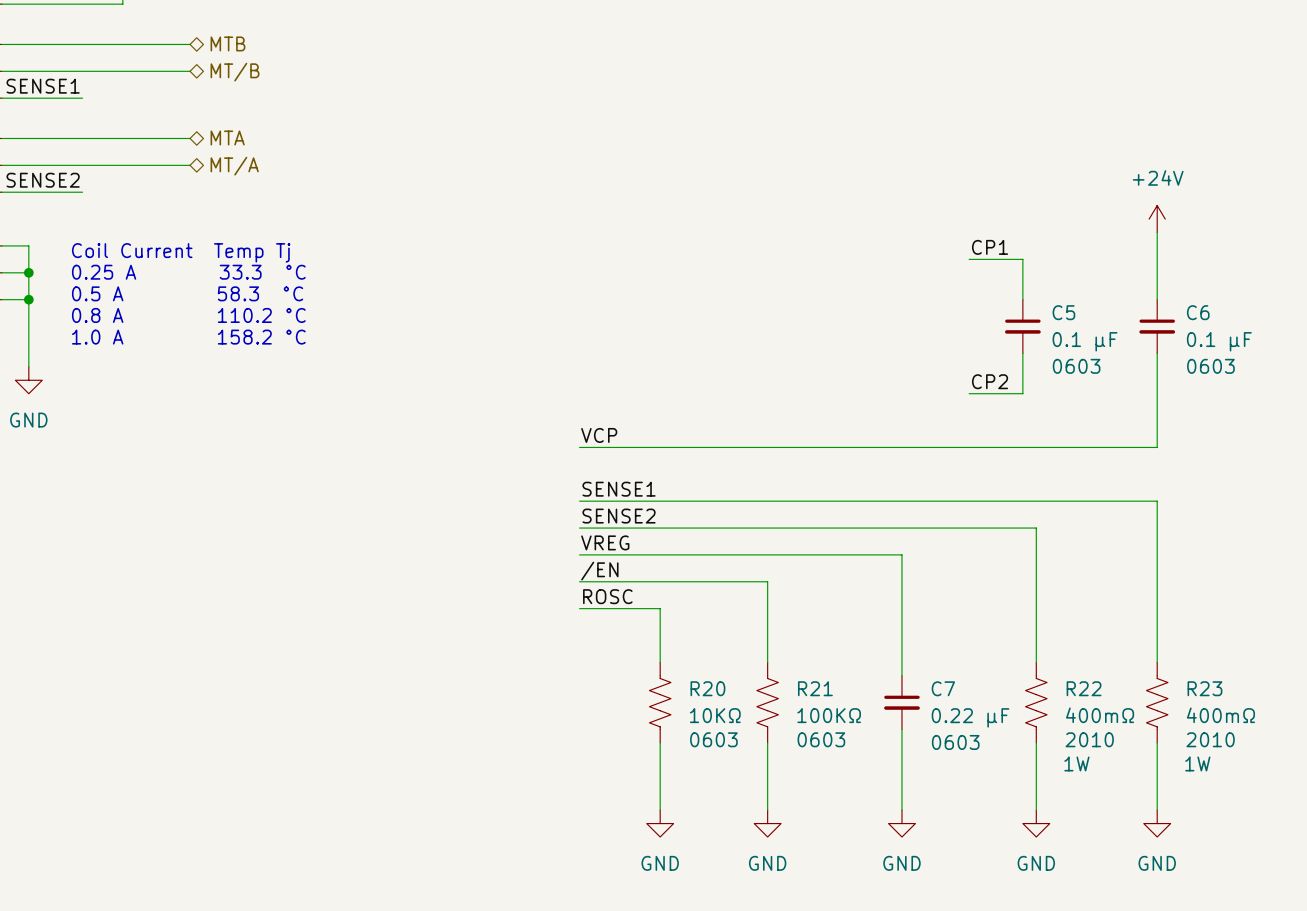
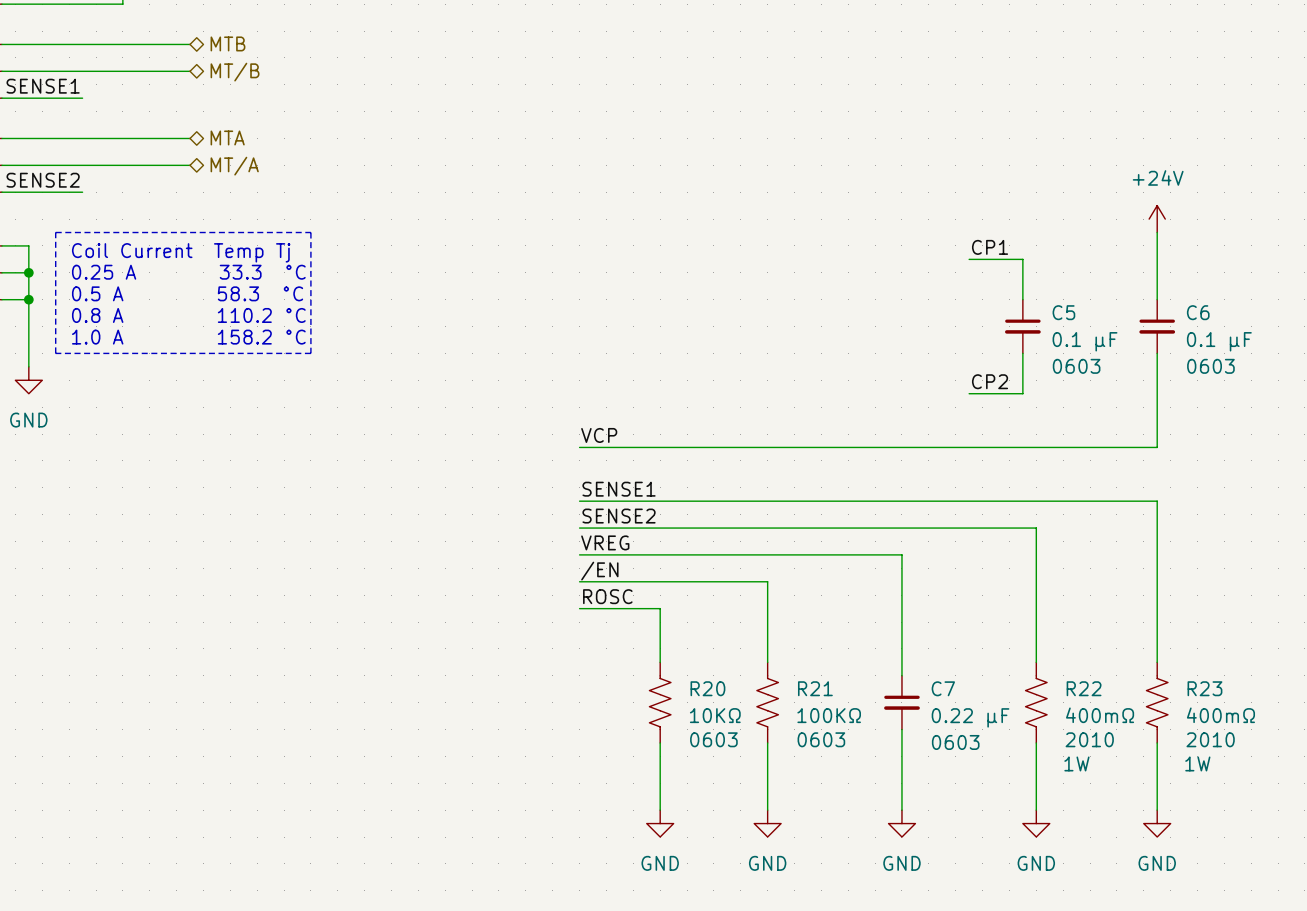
line: none -> (55, 232) (310, 232) (310, 353) (55, 353) (55, 232)

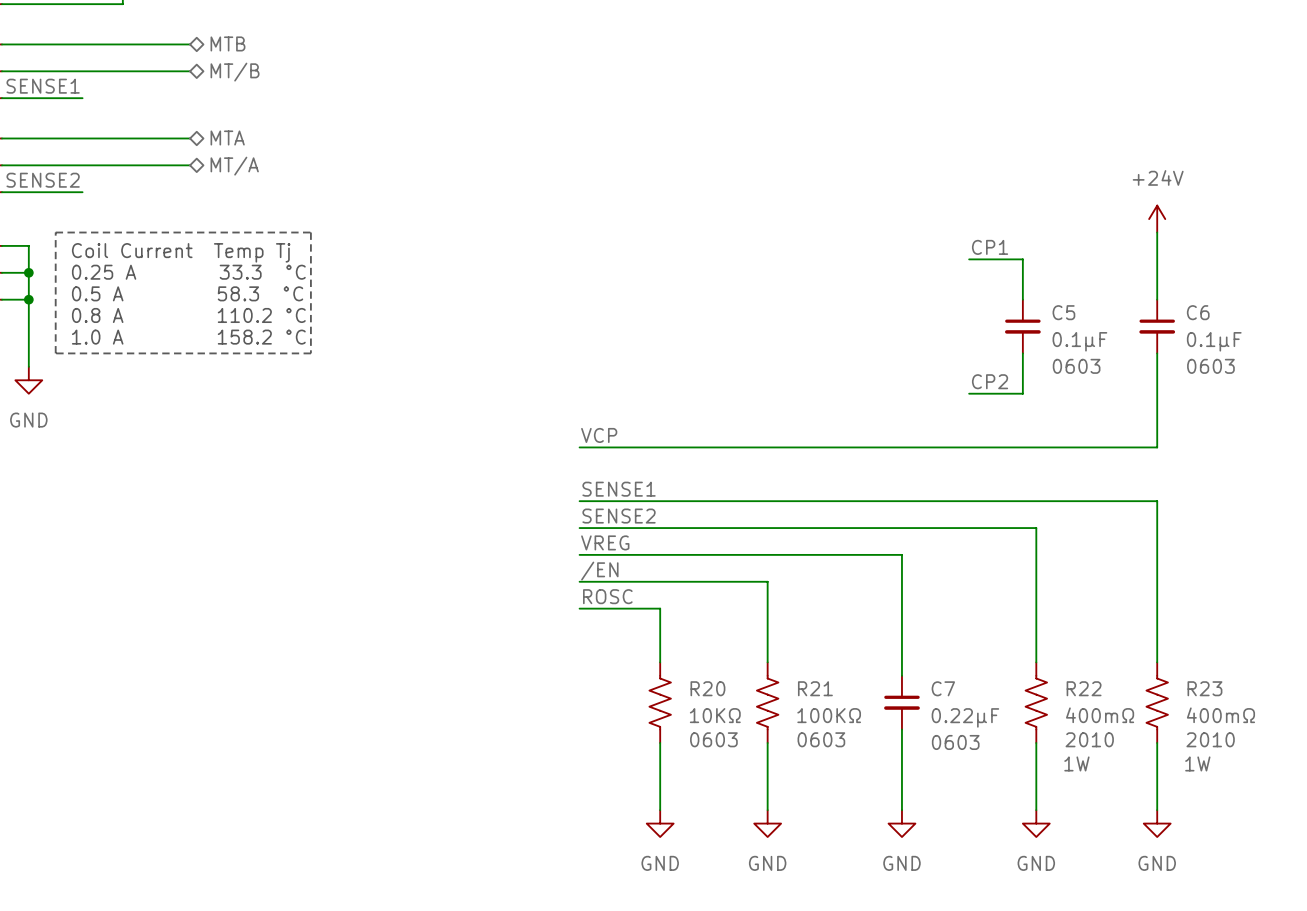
C5 value: 0.1 µF (1085, 341) -> 0.1µF (1079, 341)
C6 value: 0.1 µF (1219, 341) -> 0.1µF (1214, 341)
C7 value: 0.22 µF (970, 717) -> 0.22µF (965, 717)

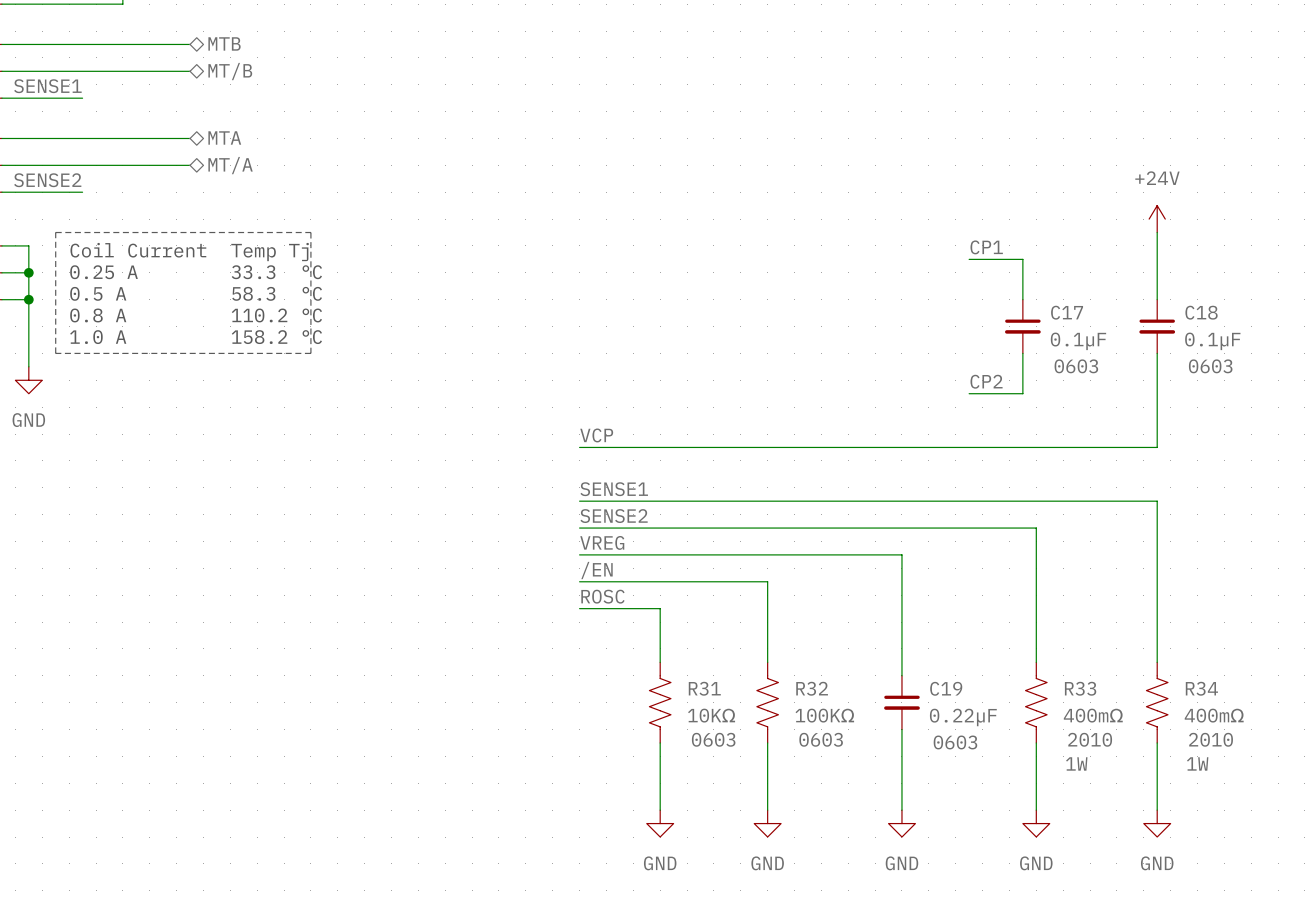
C5 name: C5 (1063, 312) -> C17 (1067, 312)
C6 name: C6 (1198, 312) -> C18 (1201, 312)
R20 name: R20 (707, 688) -> R31 (704, 688)
R21 name: R21 (815, 688) -> R32 (812, 688)
C7 name: C7 (943, 688) -> C19 (946, 688)
R22 name: R22 (1084, 688) -> R33 (1080, 688)
R23 name: R23 (1204, 688) -> R34 (1201, 688)

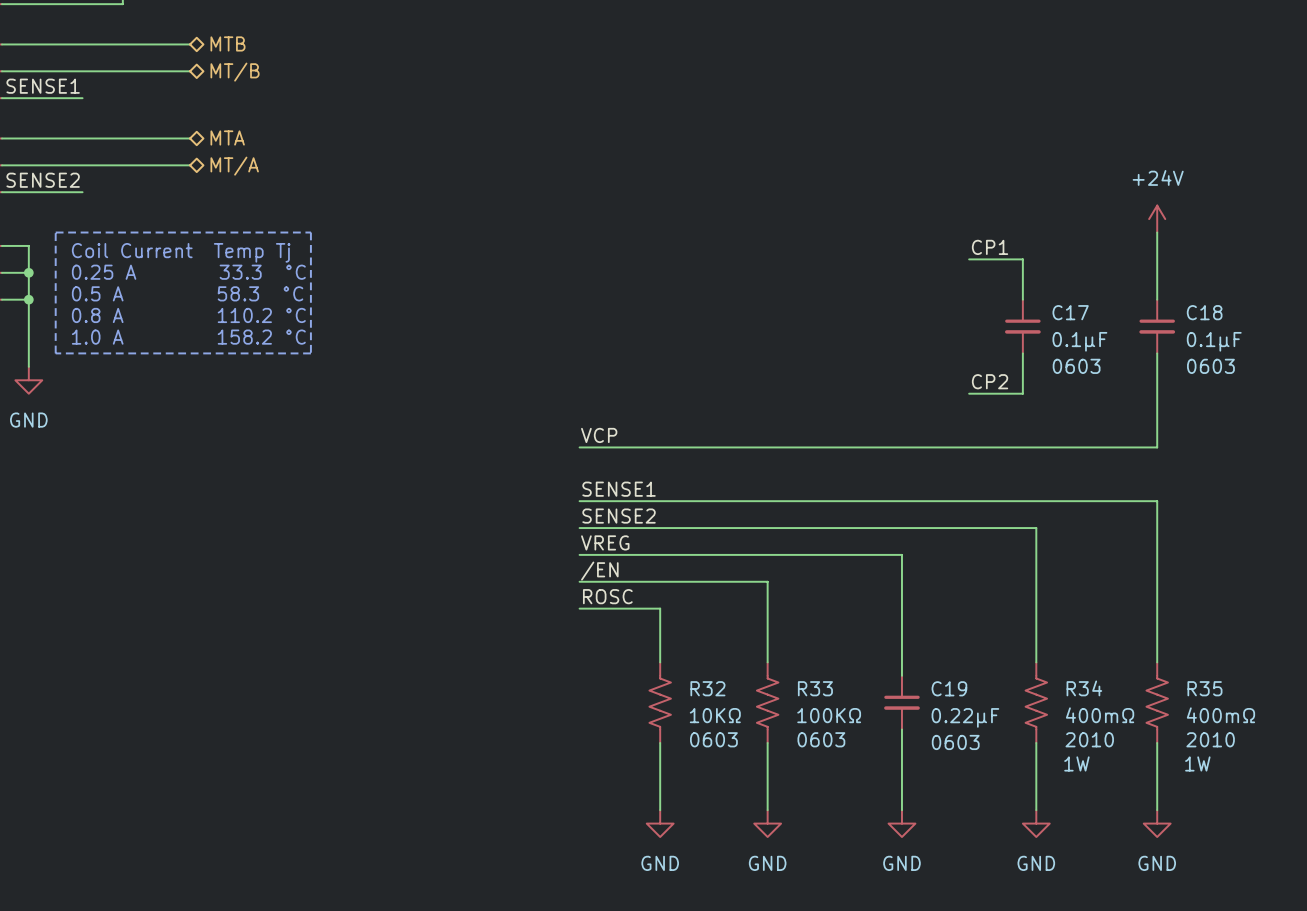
R31 name: R31 (704, 688) -> R32 (707, 688)
R32 name: R32 (812, 688) -> R33 (815, 688)
R33 name: R33 (1080, 688) -> R34 (1084, 688)
R34 name: R34 (1201, 688) -> R35 (1204, 688)

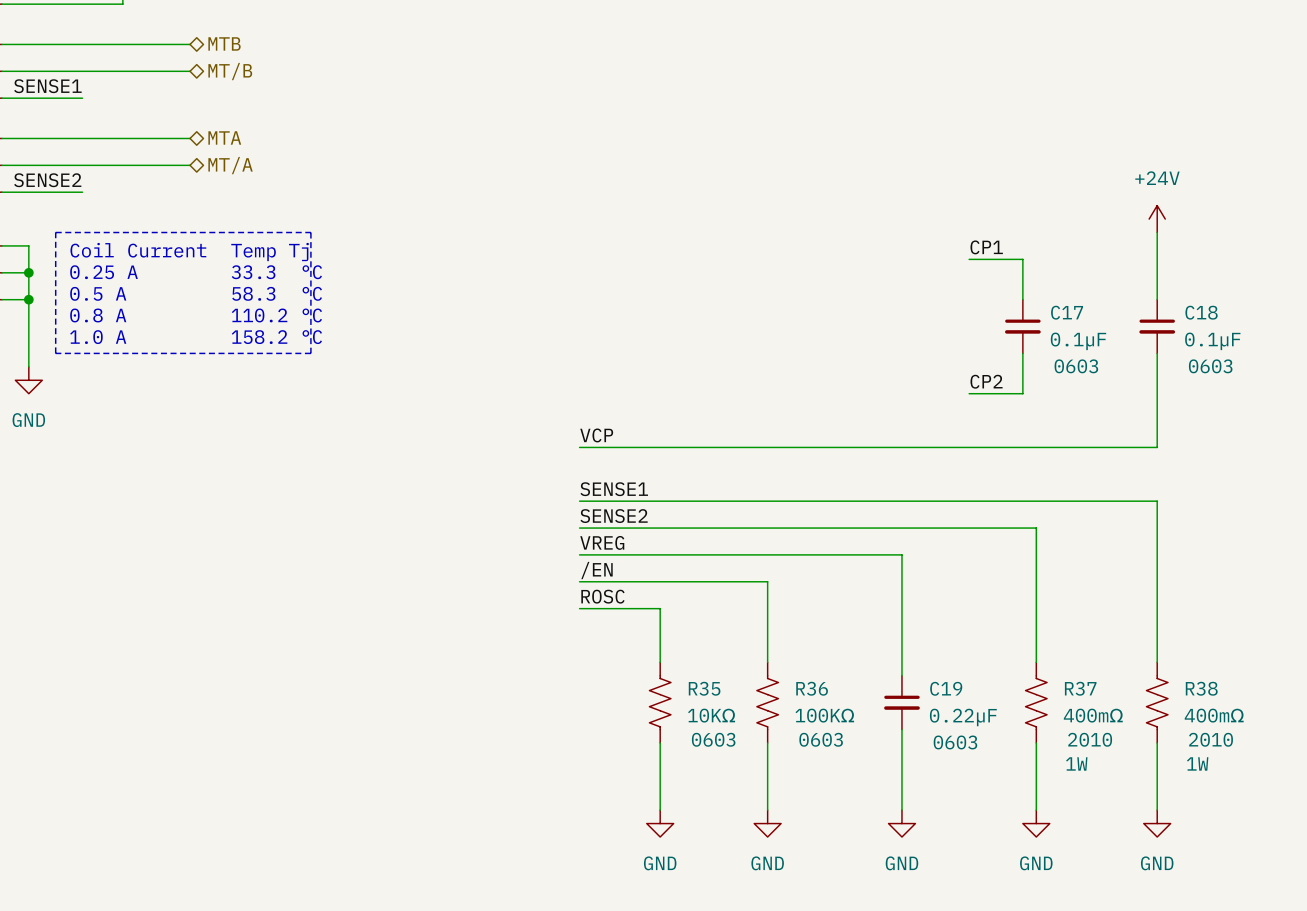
R32 name: R32 (707, 688) -> R35 (704, 688)
R33 name: R33 (815, 688) -> R36 (812, 688)
R34 name: R34 (1084, 688) -> R37 (1080, 688)
R35 name: R35 (1204, 688) -> R38 (1201, 688)

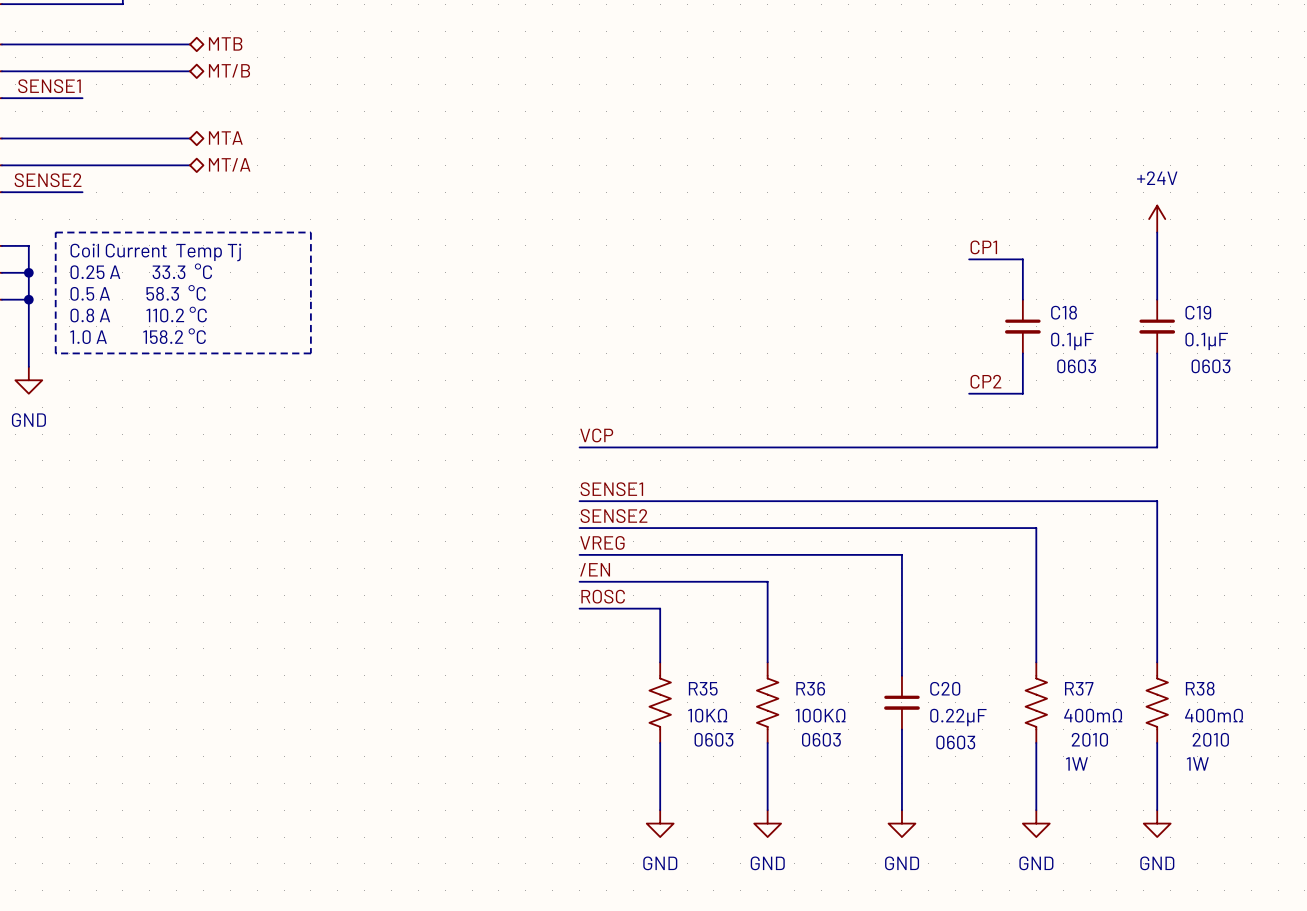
C17 name: C17 (1067, 312) -> C18 (1064, 312)
C18 name: C18 (1201, 312) -> C19 (1198, 312)
C19 name: C19 (946, 688) -> C20 (945, 688)

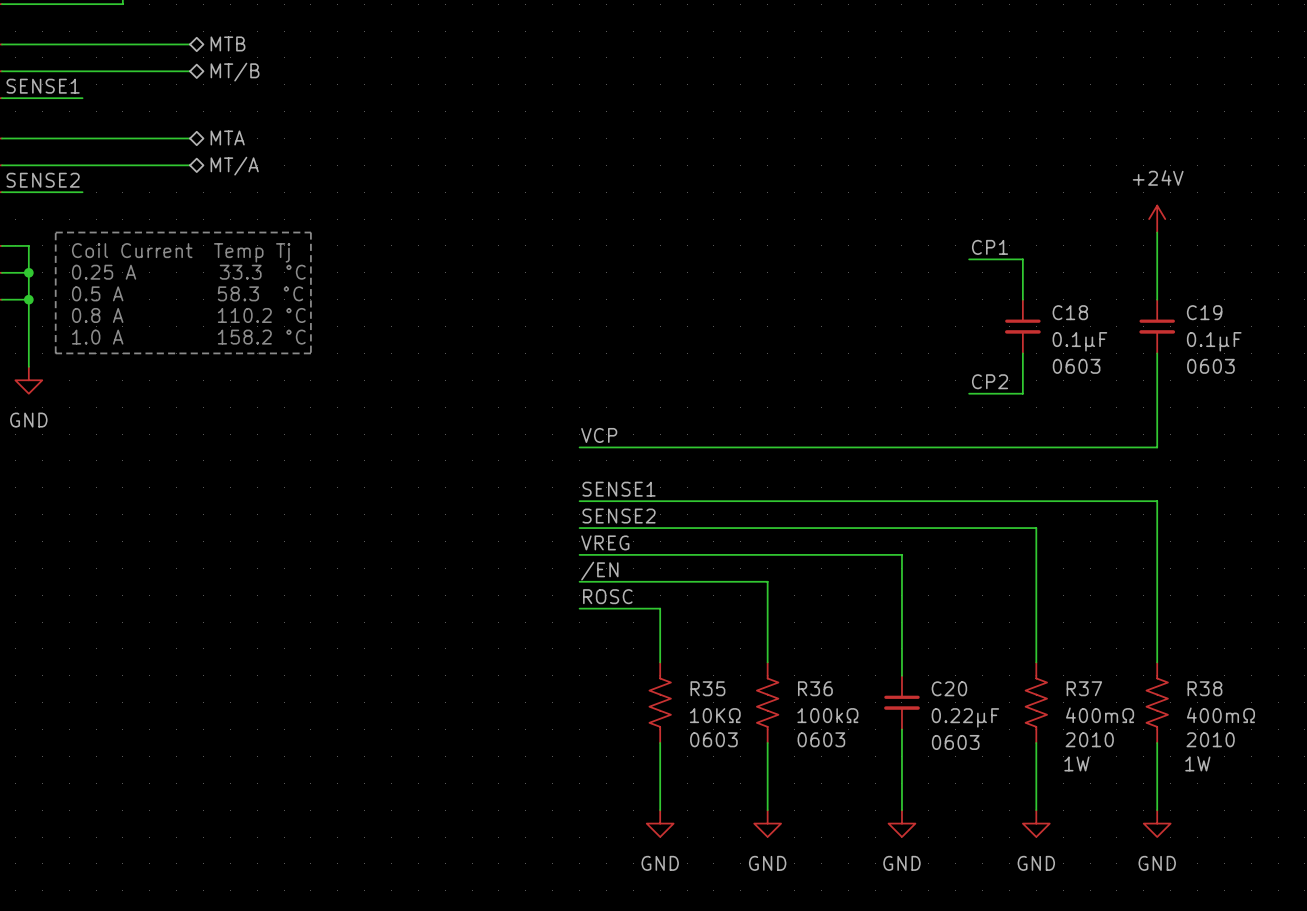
R36 value: 100KΩ (820, 715) -> 100kΩ (827, 715)

